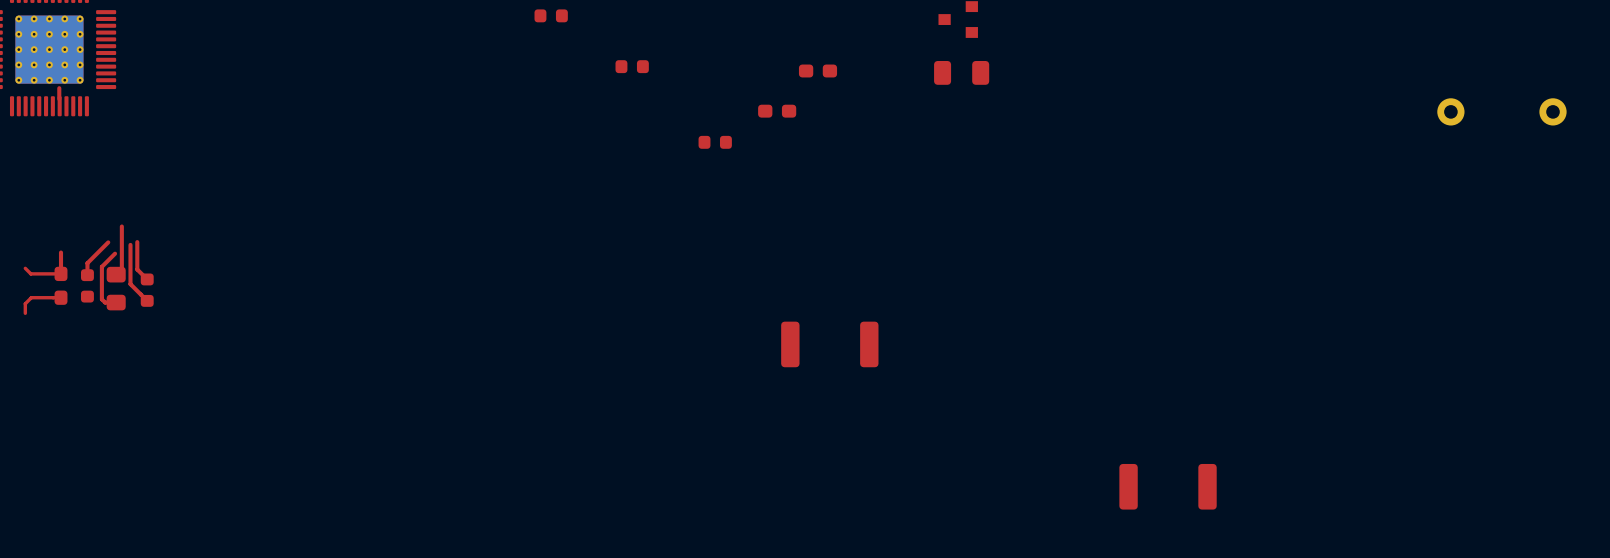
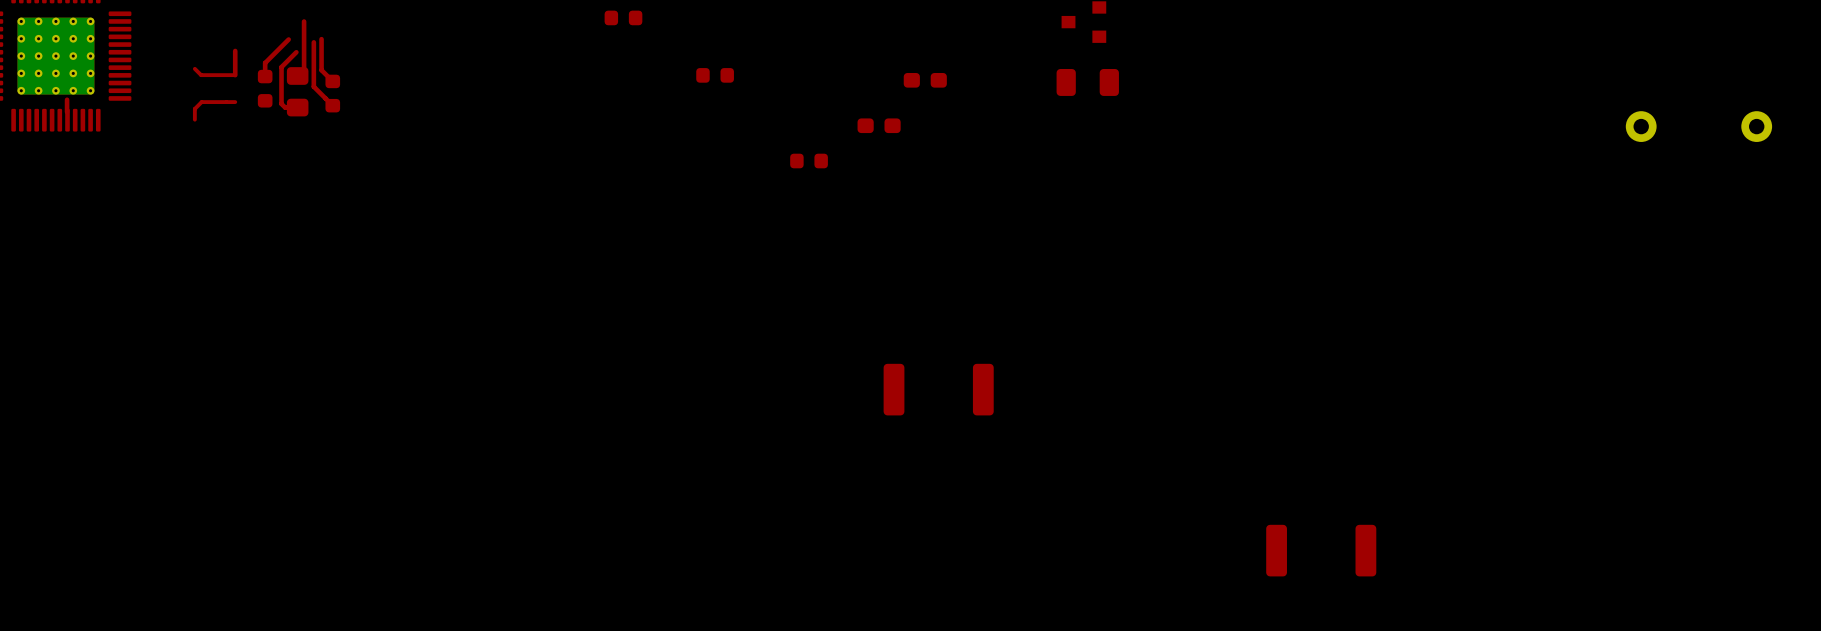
part: none -> (265, 88)
part: none -> (332, 93)
top track: (121, 226) (121, 268) (116, 274) -> (304, 21) (304, 69) (297, 75)
top track: (108, 242) (87, 263) (87, 275) -> (288, 39) (265, 63) (265, 76)
top track: (137, 242) (137, 269) (147, 279) -> (321, 39) (321, 70) (332, 81)
top track: (130, 244) (130, 284) (147, 300) -> (313, 42) (313, 86) (332, 105)
top track: (61, 252) (61, 273) (30, 273) (25, 268) -> (235, 50) (235, 75) (201, 75) (194, 68)
top track: (115, 253) (101, 266) (101, 299) (105, 302) (116, 302) -> (296, 52) (281, 67) (281, 103) (285, 107) (297, 107)
part: (61, 285) -> none
part: (87, 285) -> none
part position: (116, 288) -> (297, 91)
part: (147, 290) -> none
top track: (61, 297) (31, 297) (25, 303) (25, 313) -> (235, 102) (201, 102) (194, 108) (194, 119)

